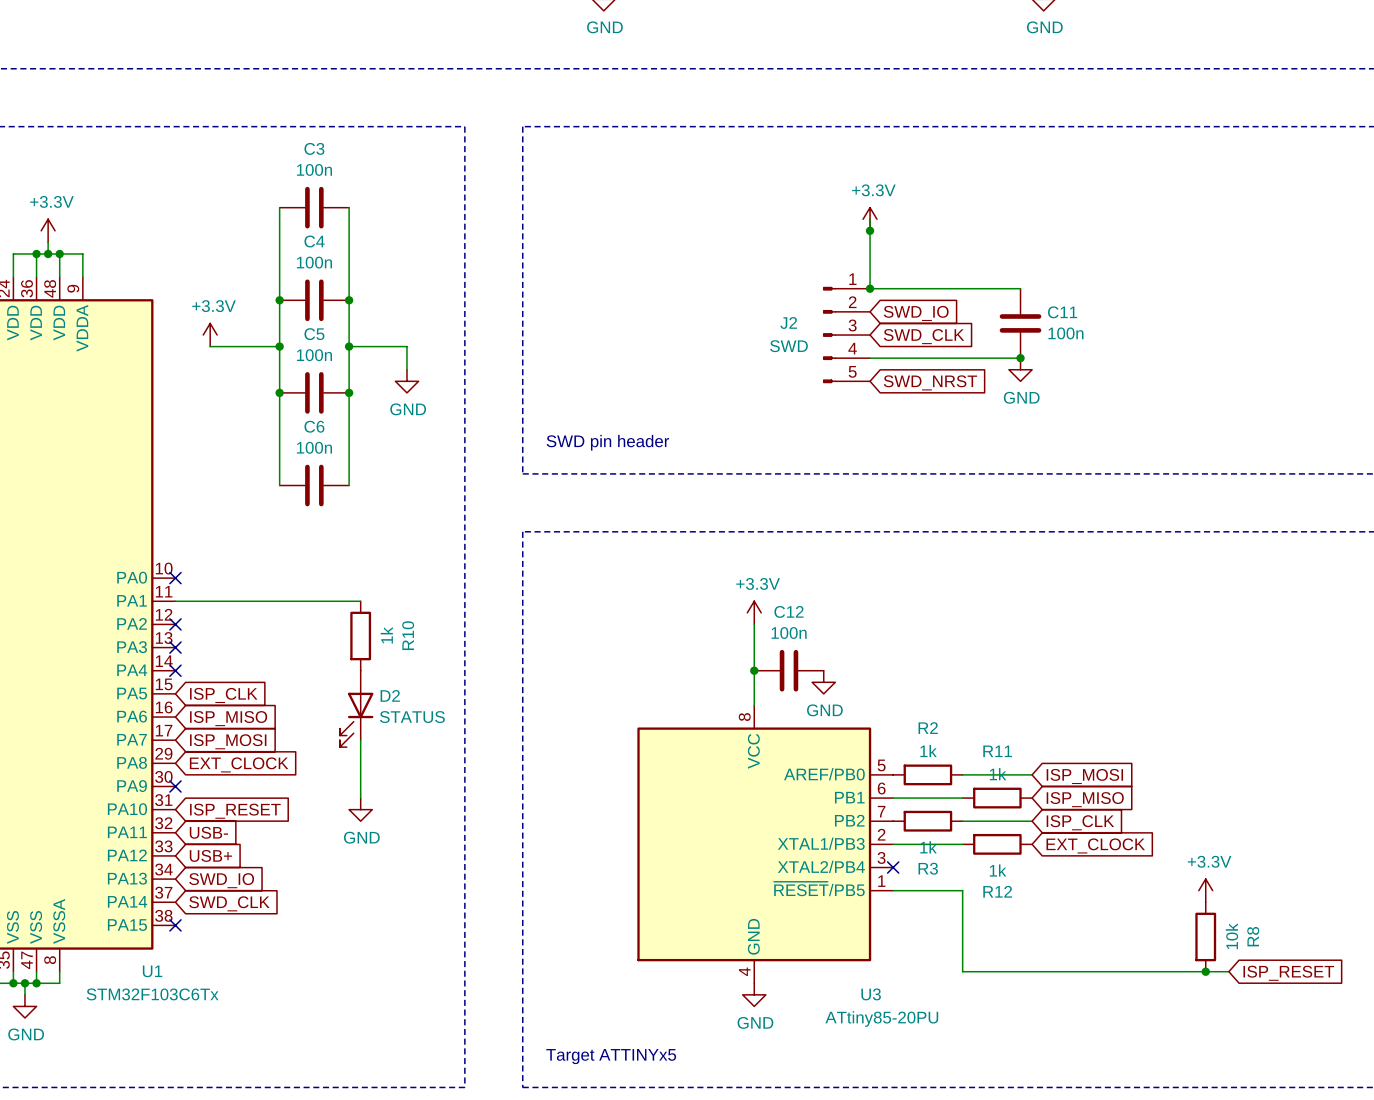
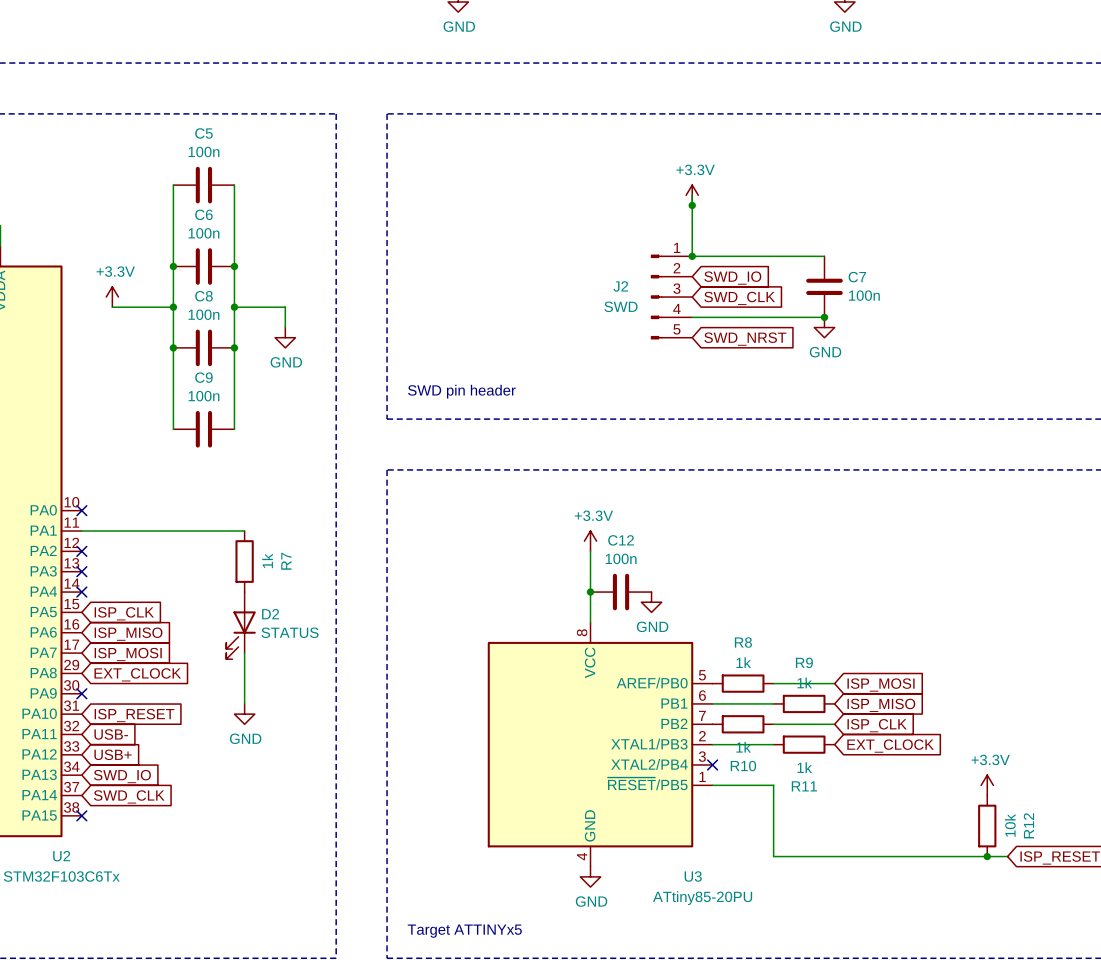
C3 name: C3 (314, 148) -> C5 (203, 133)
C4 name: C4 (314, 241) -> C6 (203, 214)
C11 name: C11 (1062, 312) -> C7 (857, 277)
C5 name: C5 (314, 334) -> C8 (203, 296)
C6 name: C6 (314, 426) -> C9 (203, 377)
R10 name: R10 (408, 635) -> R7 (286, 561)
R2 name: R2 (928, 728) -> R8 (743, 642)
R11 name: R11 (997, 751) -> R9 (804, 662)
R3 name: R3 (928, 868) -> R10 (743, 766)
R12 name: R12 (997, 891) -> R11 (804, 786)
R8 name: R8 (1253, 936) -> R12 (1028, 825)
U1 name: U1 (152, 971) -> U2 (61, 856)

